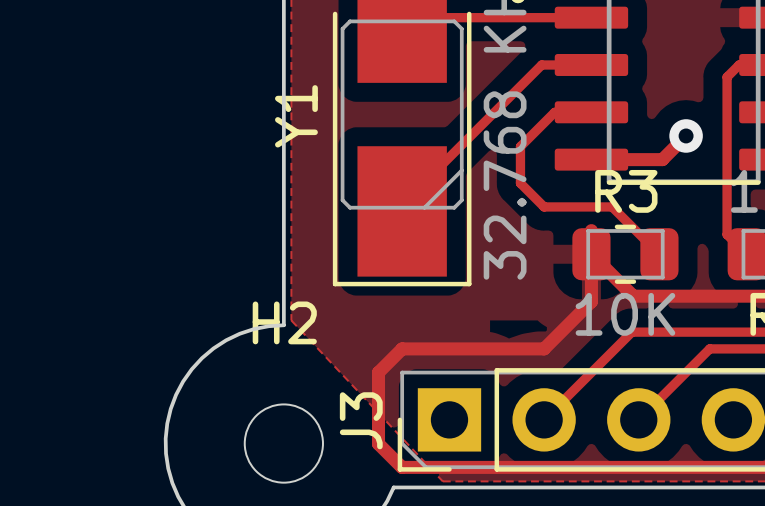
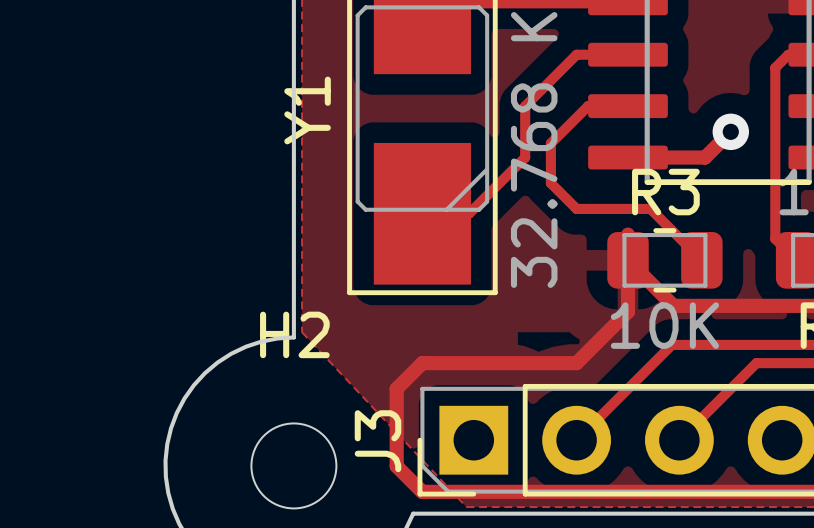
track: (544, 64) (541, 64) (425, 180) (425, 211) -> (576, 54) (525, 106) (525, 157) (468, 213) (448, 213)

